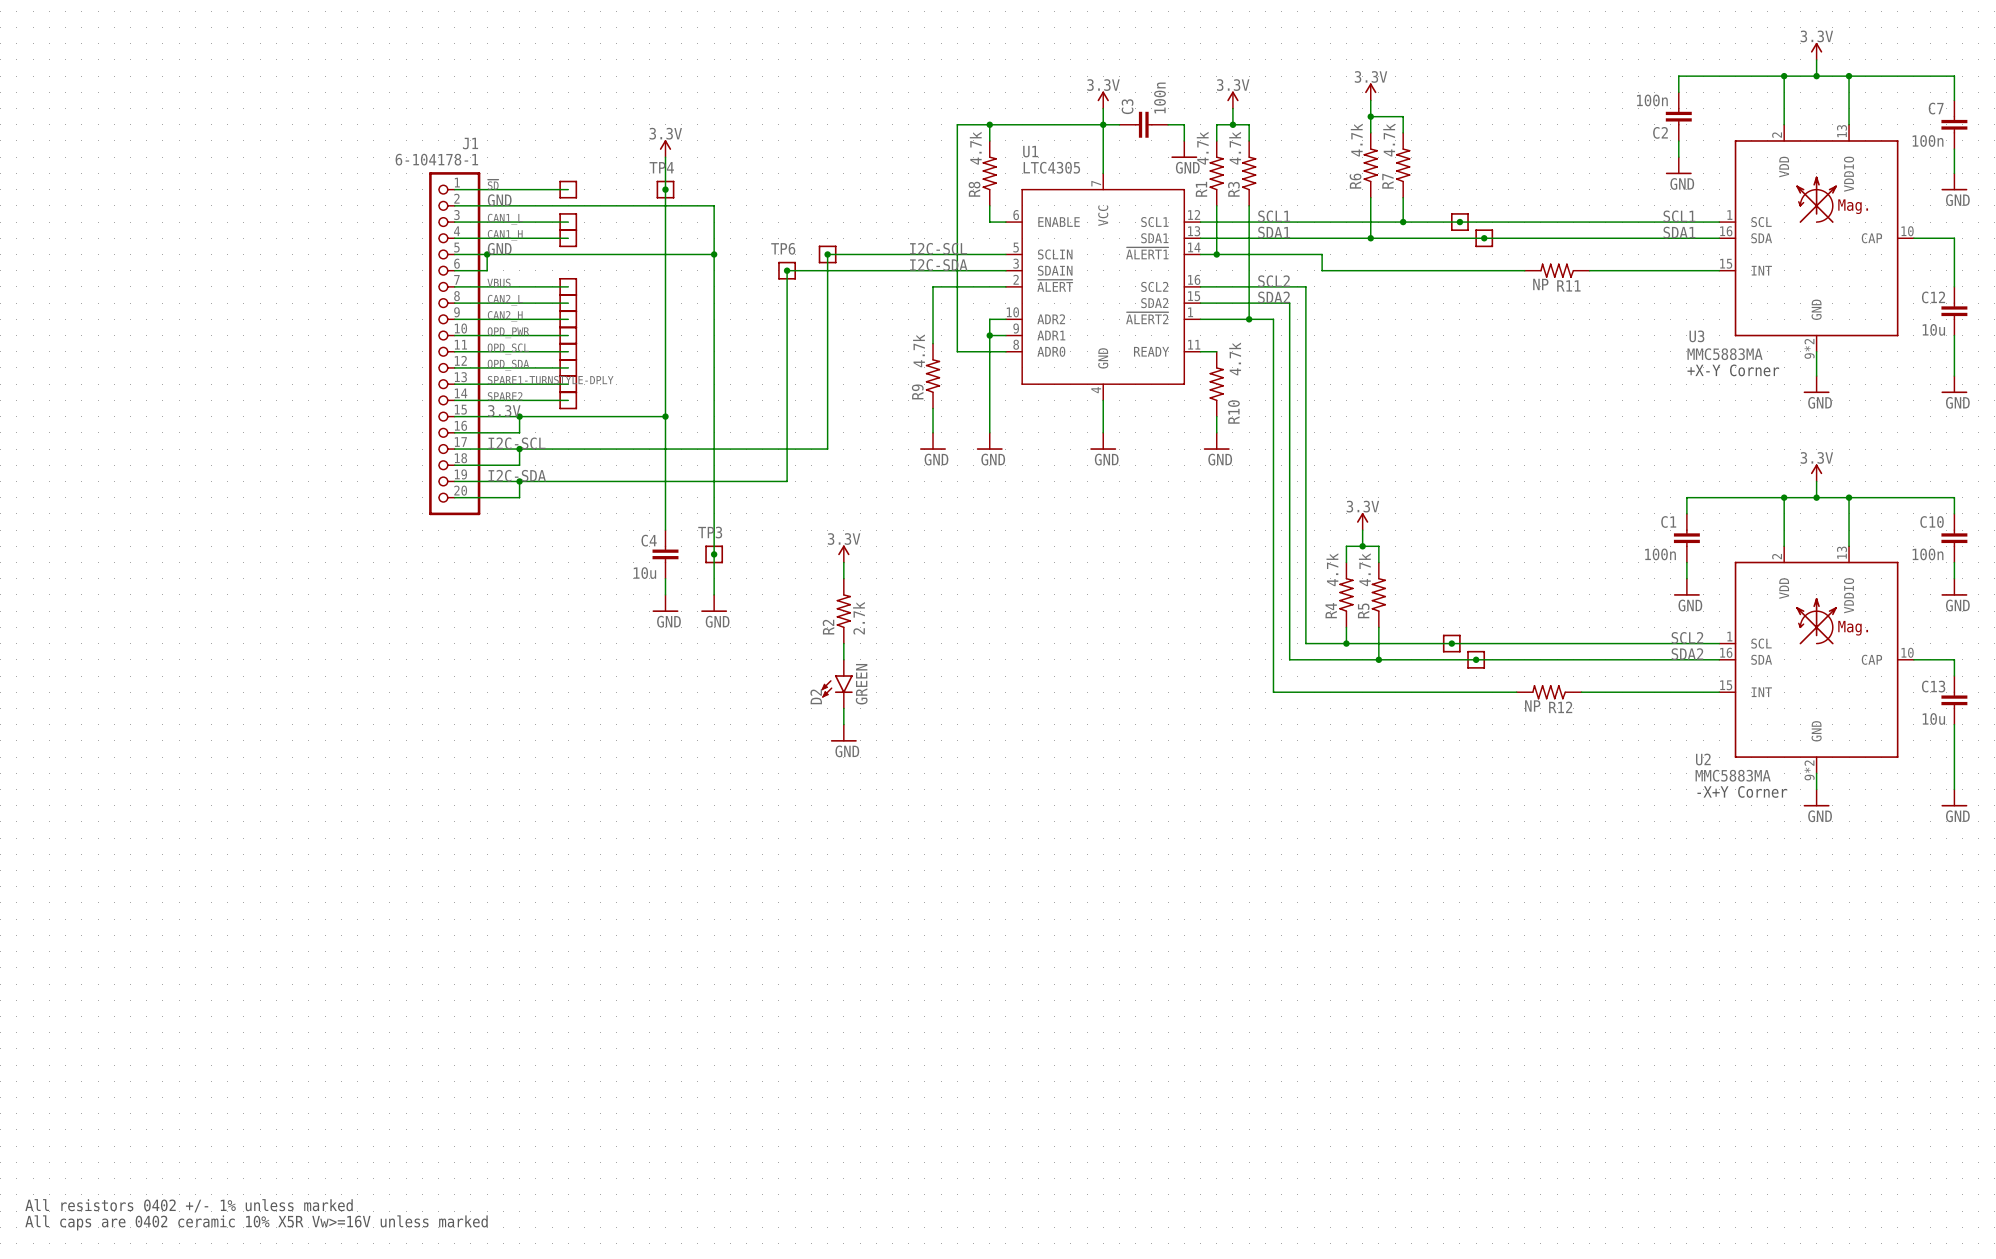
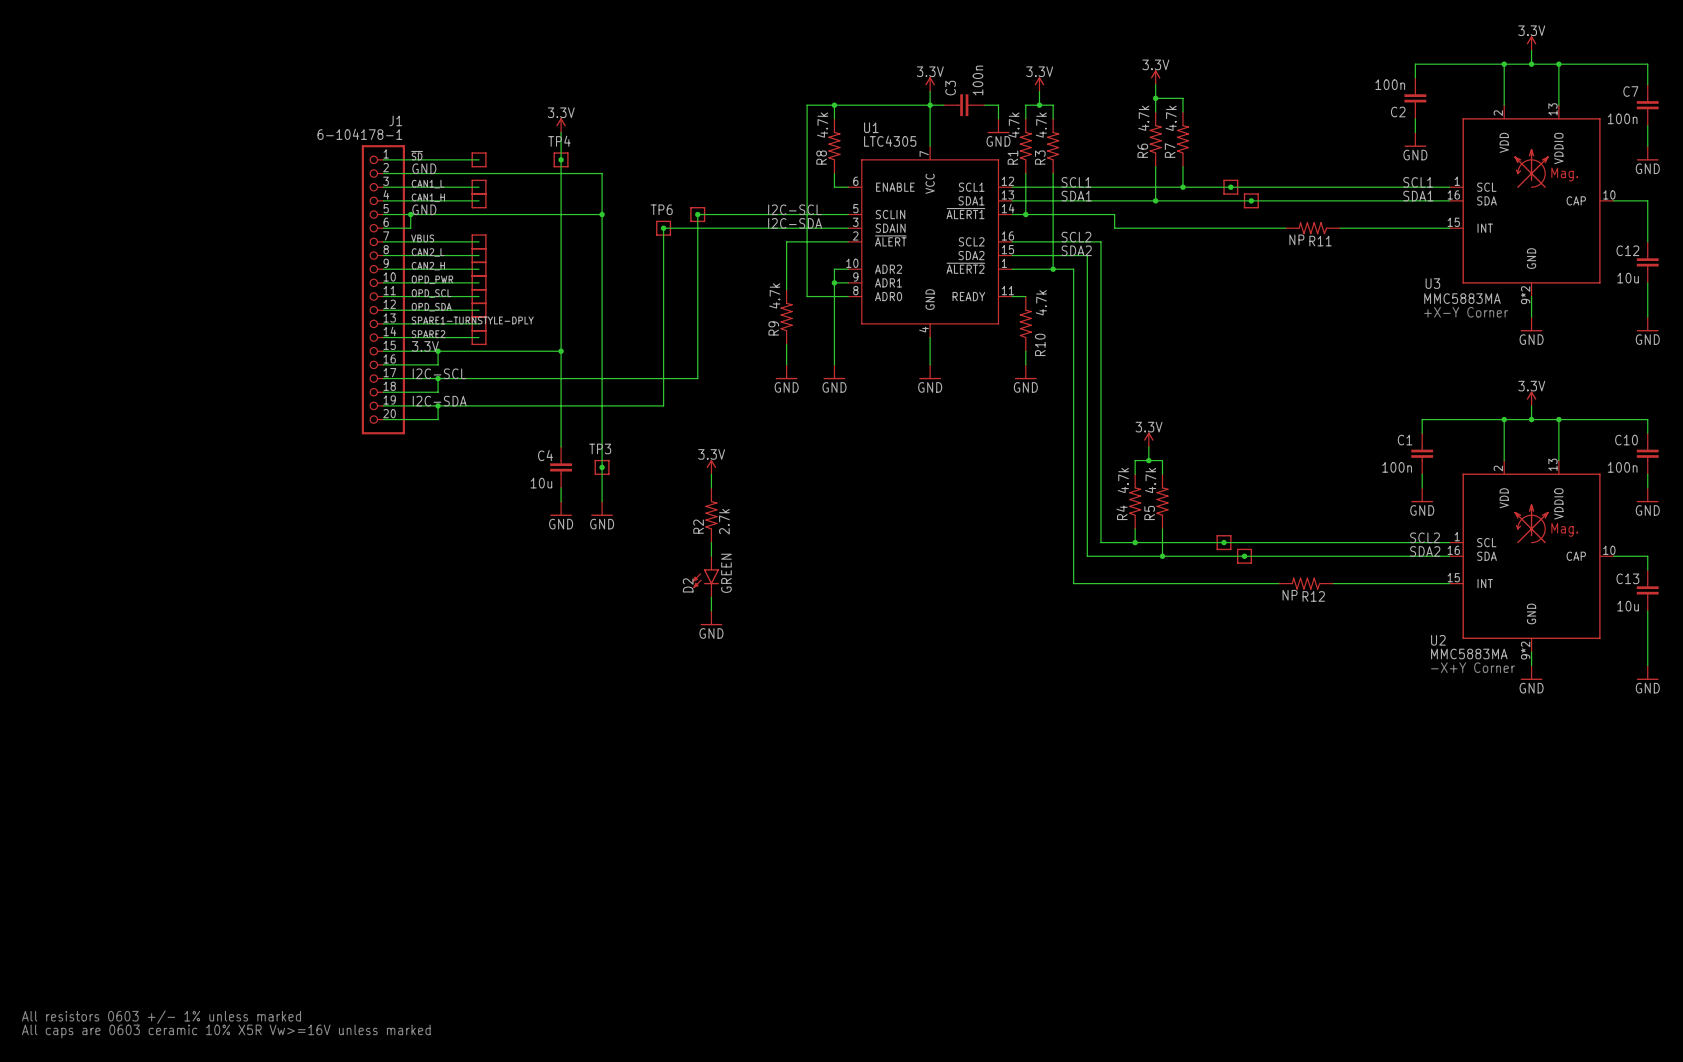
text: All resistors 0402 +/- 1% unless marked (189, 1205) -> All resistors 0603 +/- 1% unless marked (161, 1017)
text: All caps are 0402 ceramic 10% X5R Vw>=16V unless marked (256, 1222) -> All caps are 0603 ceramic 10% X5R Vw>=16V unless marked (226, 1031)

